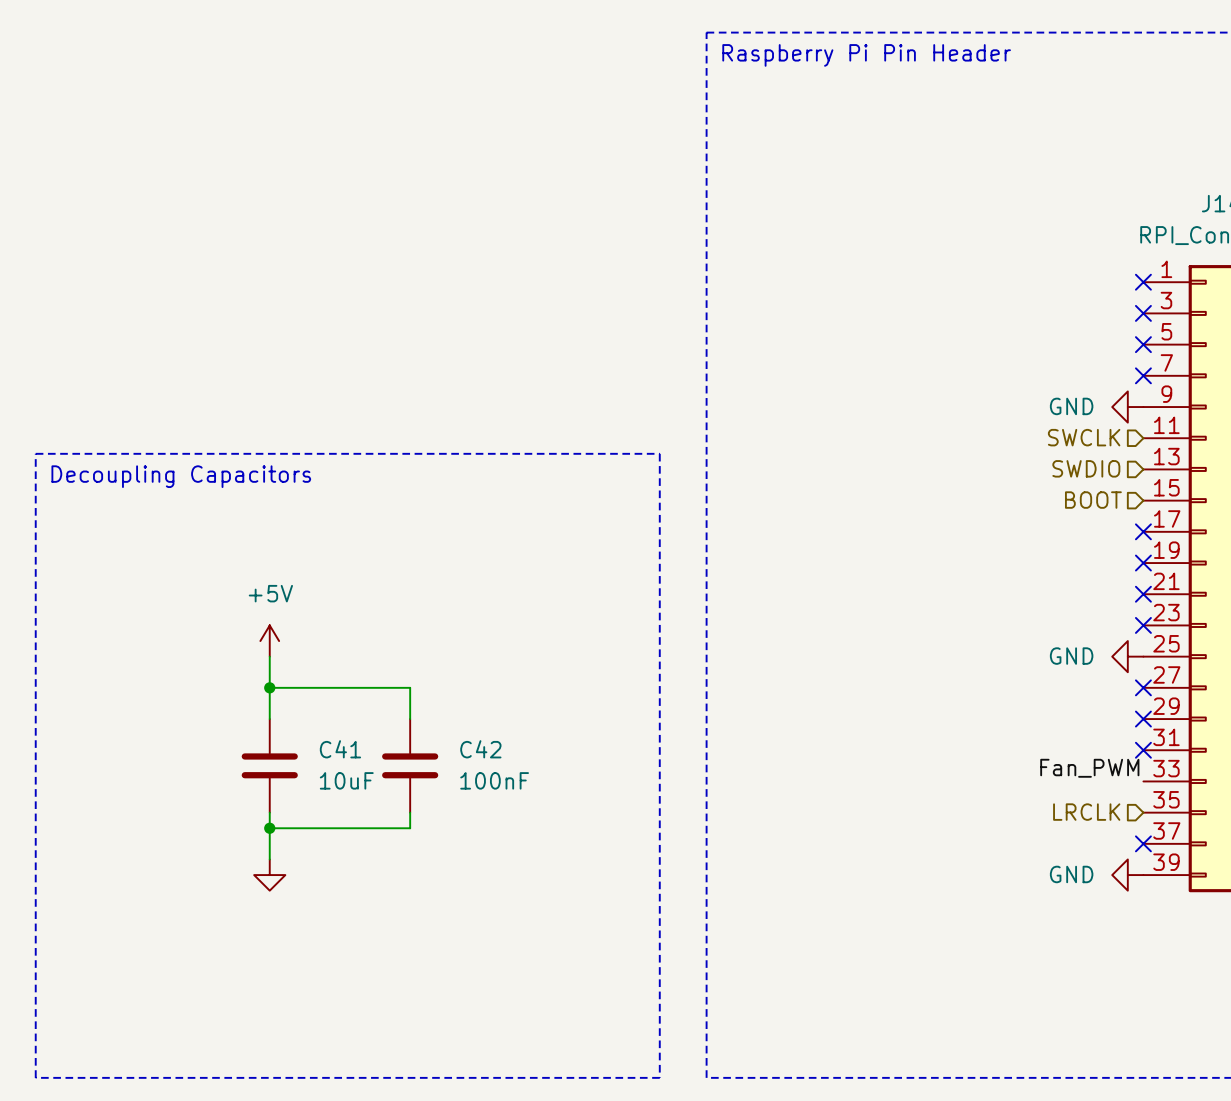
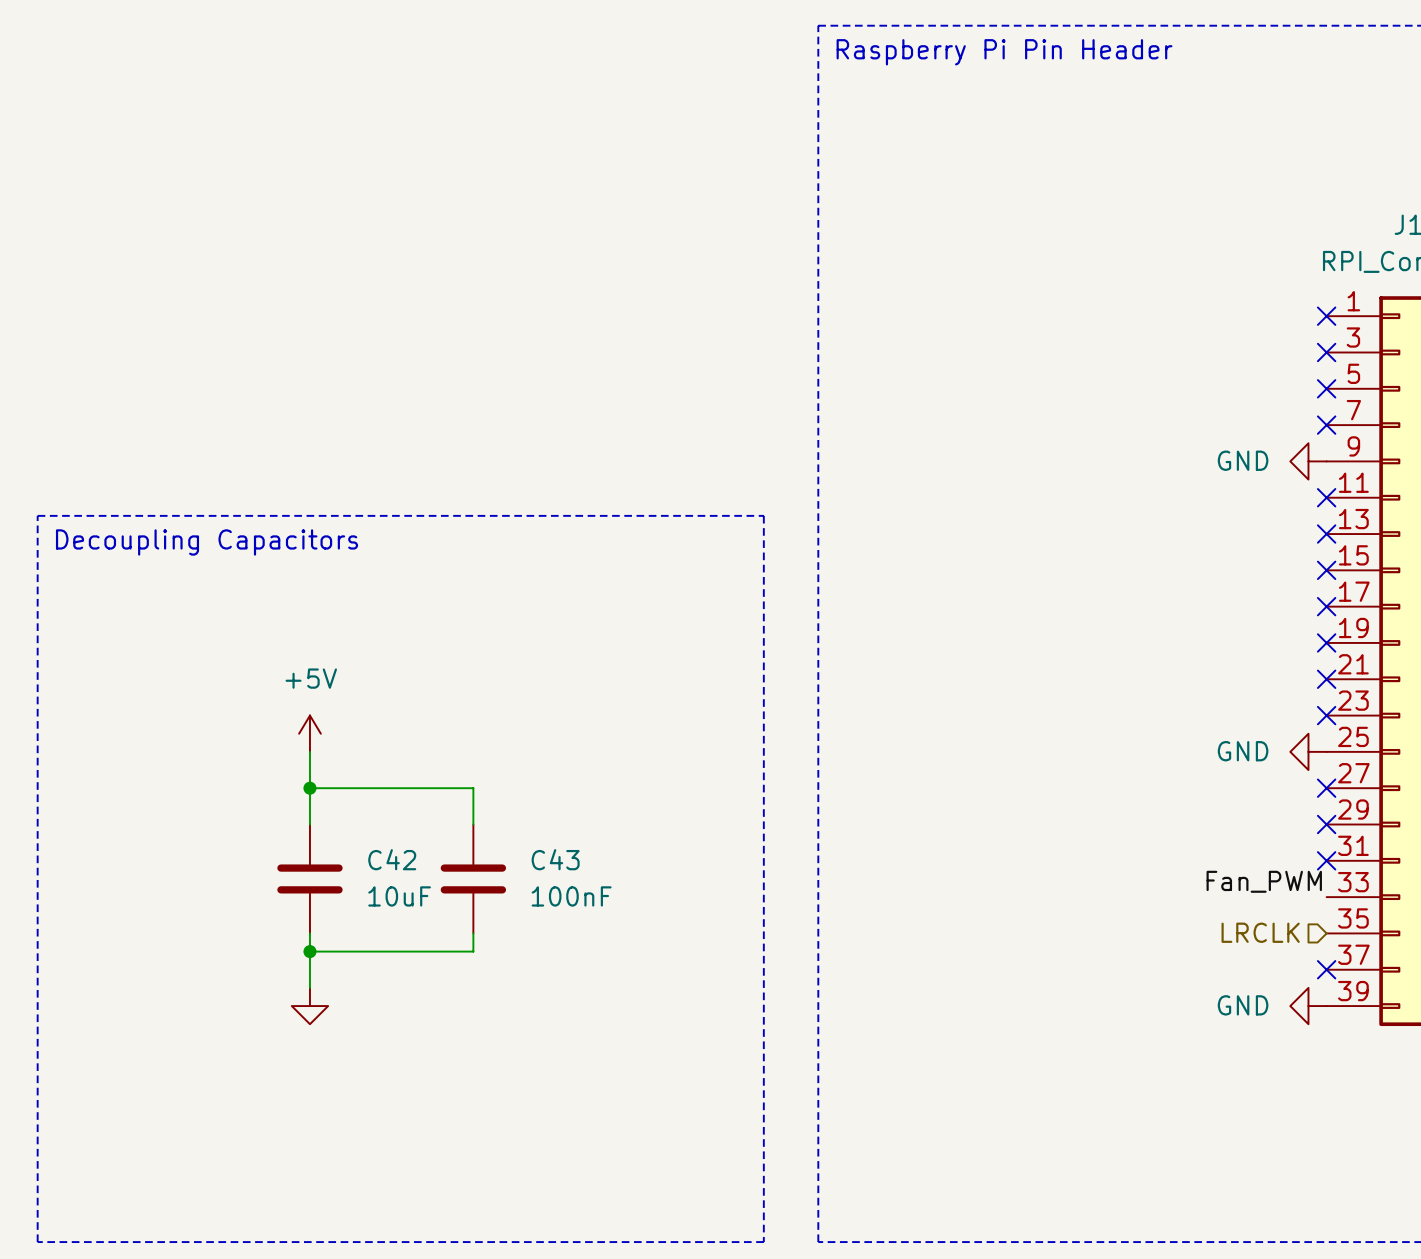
hierarchical label: SWCLK (1084, 437) -> none
no-connect mark: none -> (1326, 497)
hierarchical label: SWDIO (1086, 468) -> none
no-connect mark: none -> (1326, 534)
hierarchical label: BOOT (1093, 500) -> none
no-connect mark: none -> (1326, 570)
C41 name: C41 (340, 749) -> C42 (392, 859)
C42 name: C42 (480, 749) -> C43 (555, 859)

